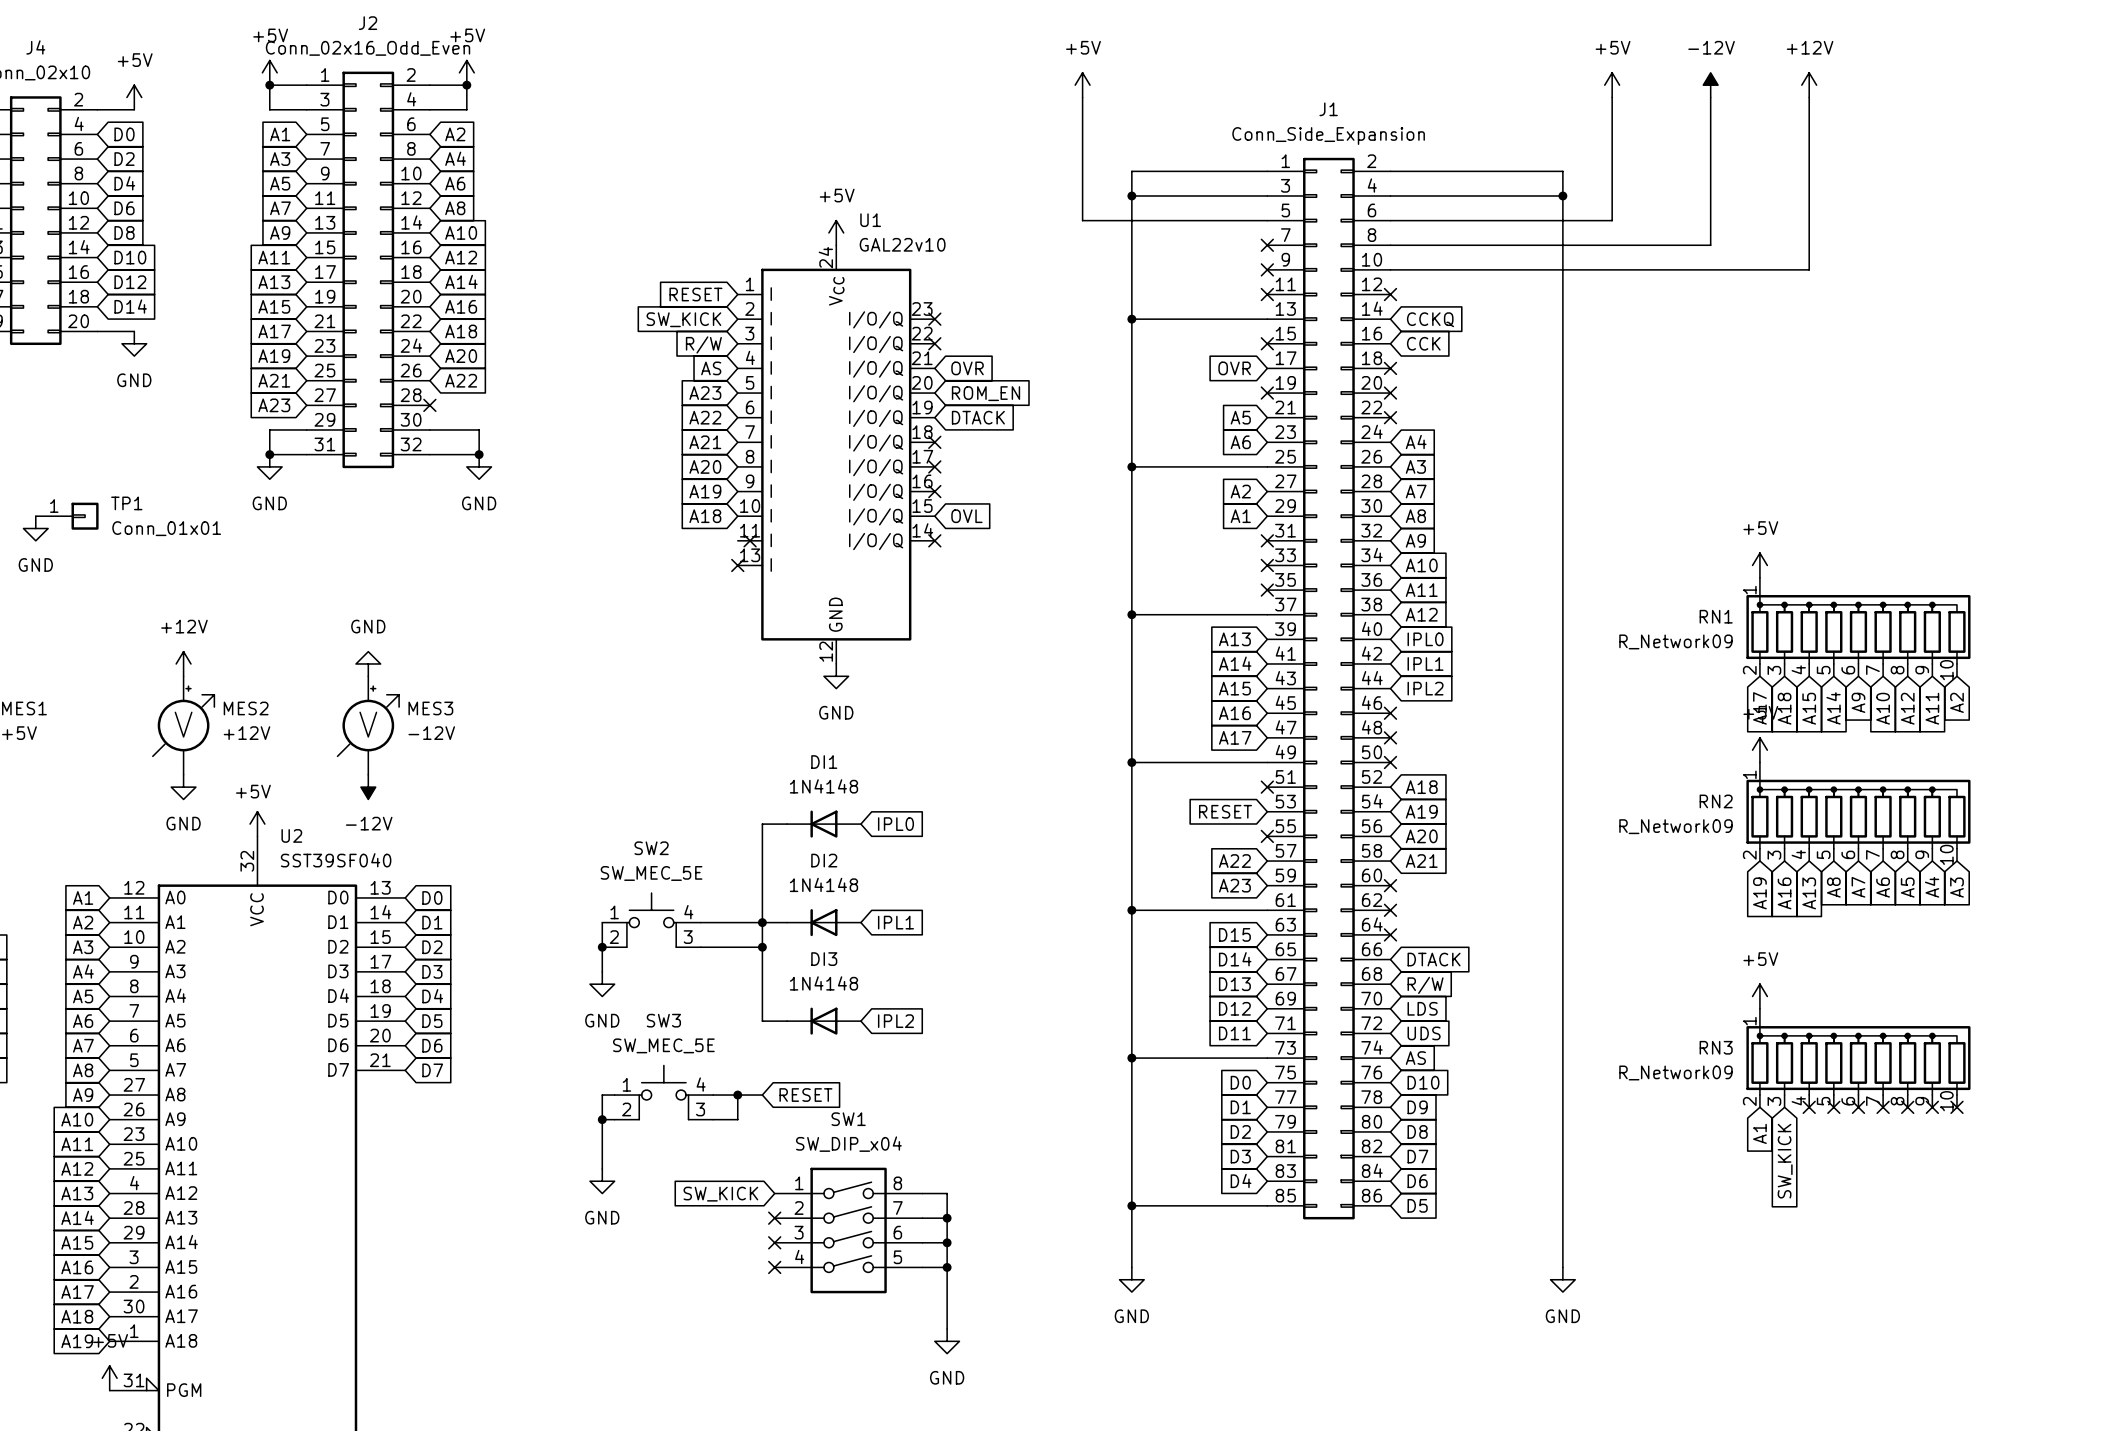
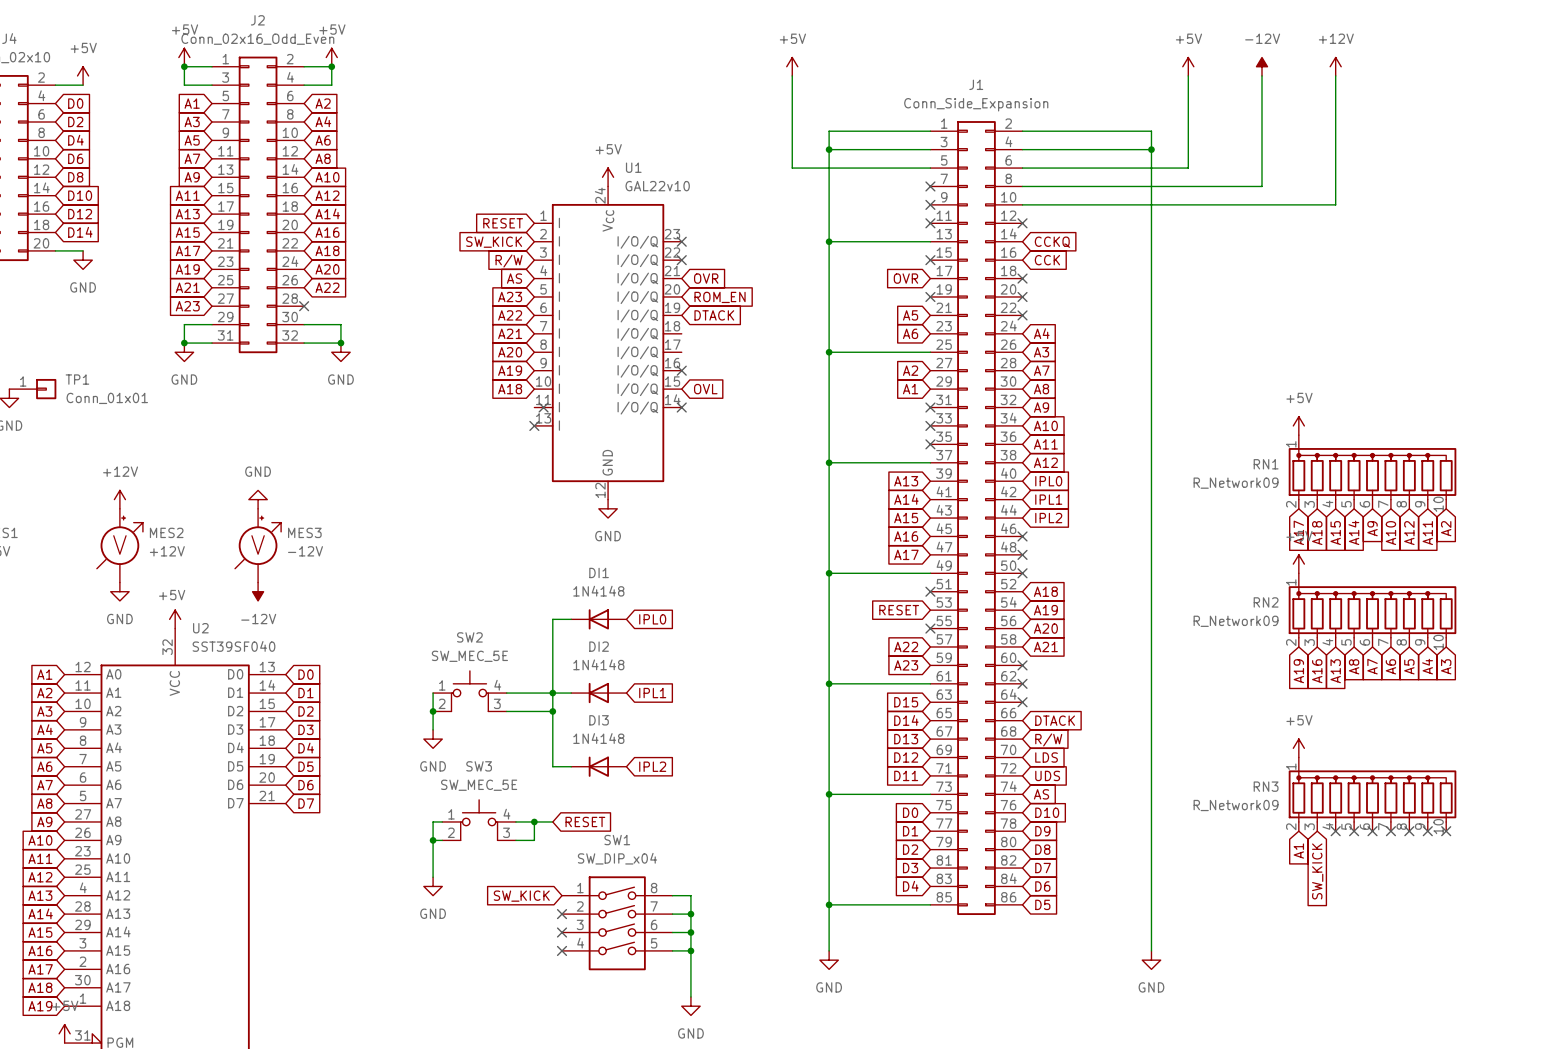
no-connect mark: (934, 442) -> none
no-connect mark: (934, 466) -> none

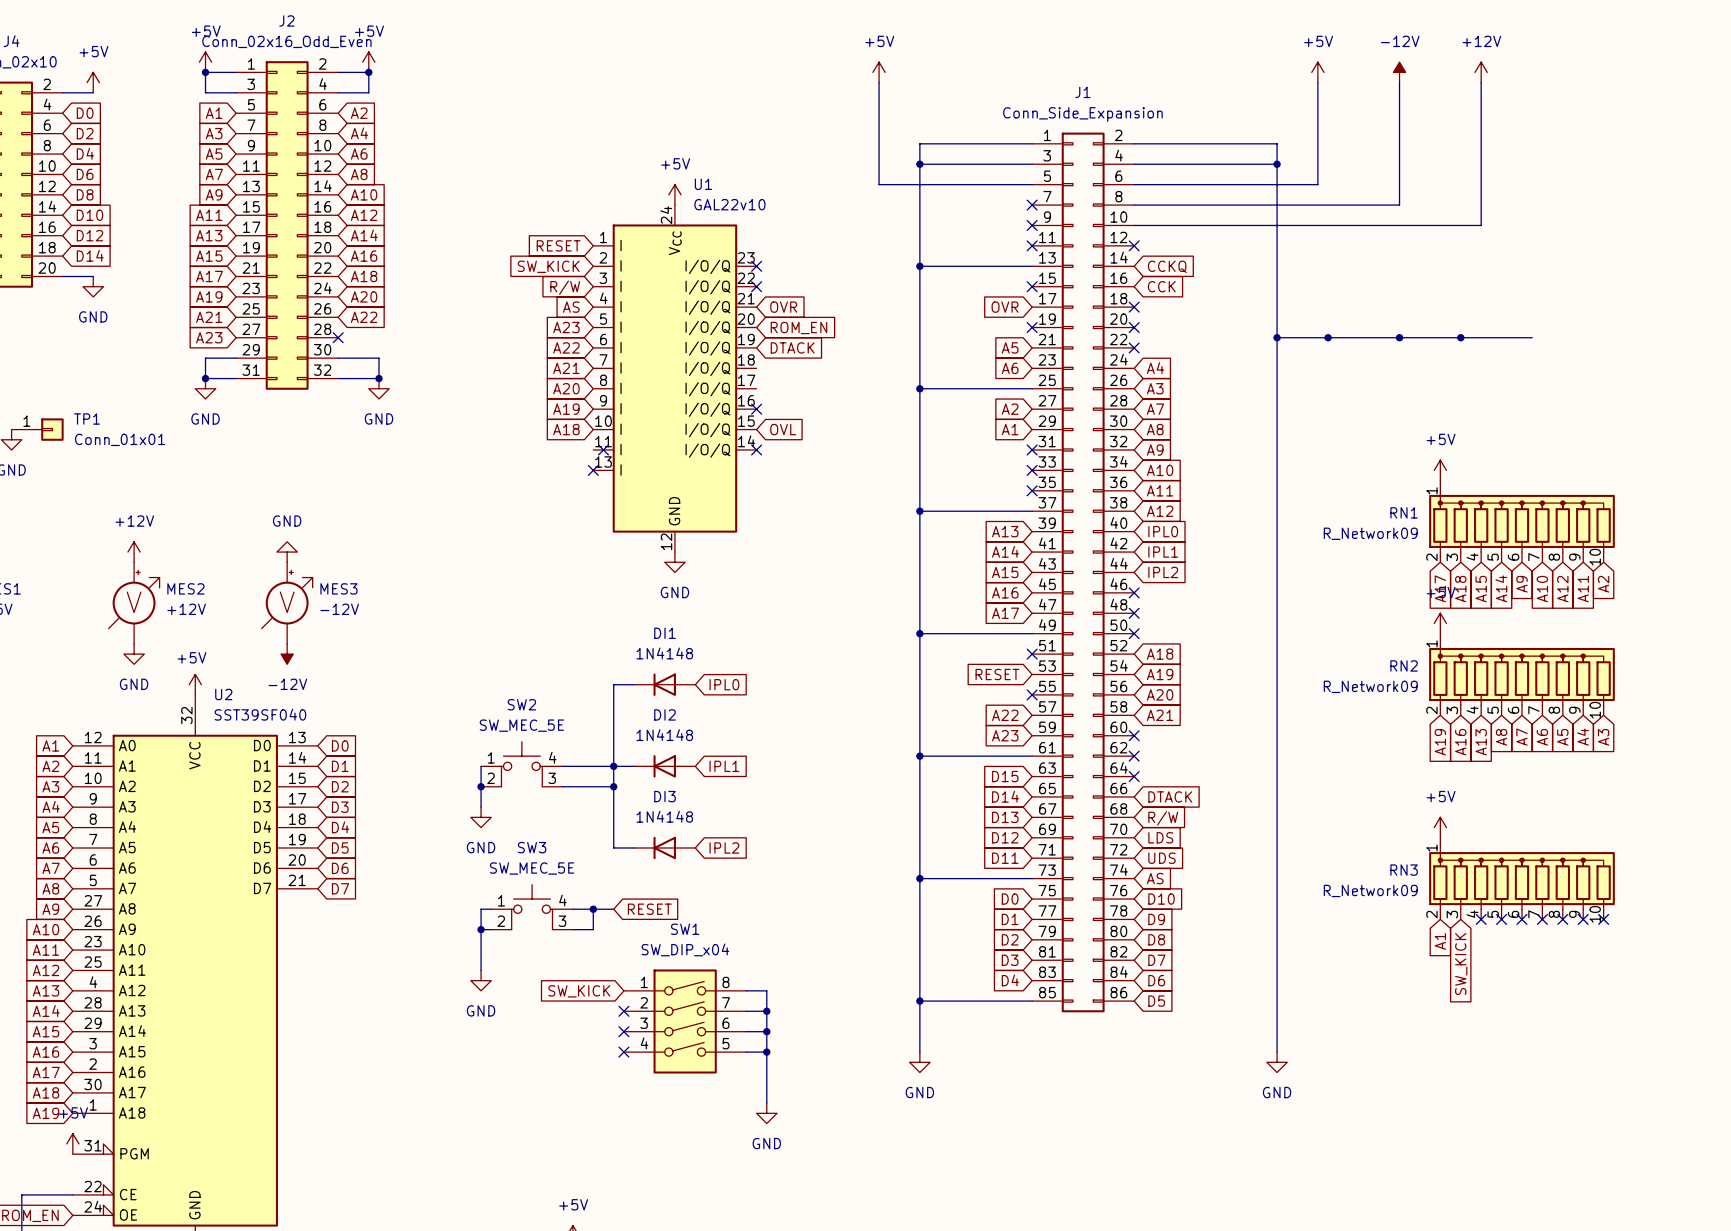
wire: none -> (1277, 337) (1532, 337)
junction: none -> (1277, 337)
junction: none -> (1328, 337)
junction: none -> (1399, 337)
junction: none -> (1460, 337)

